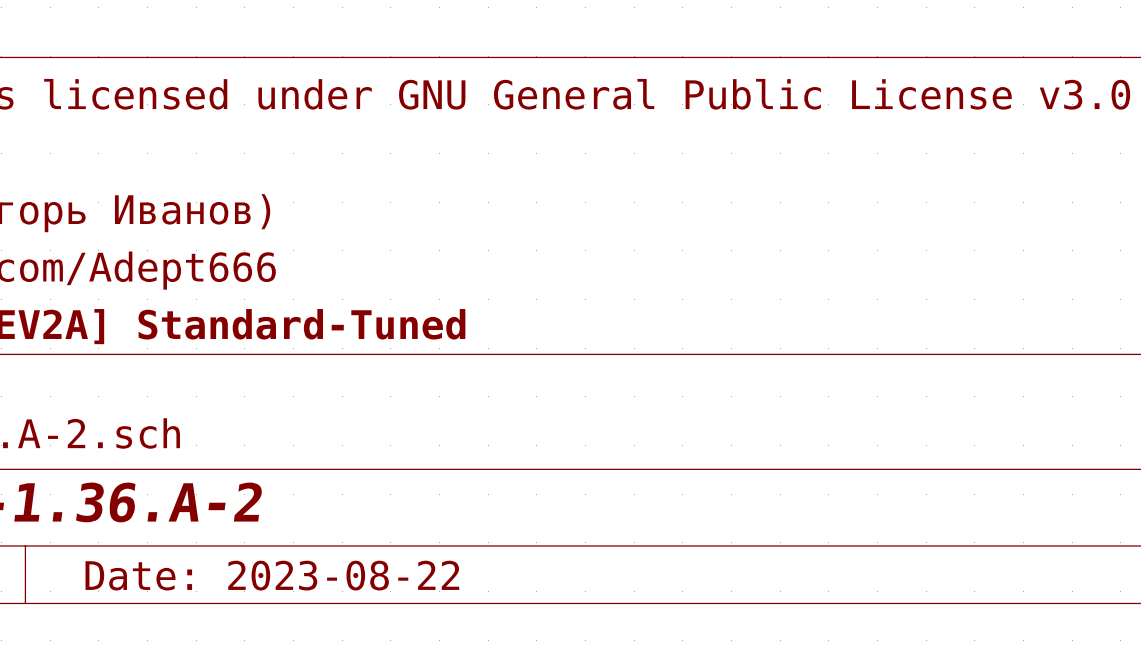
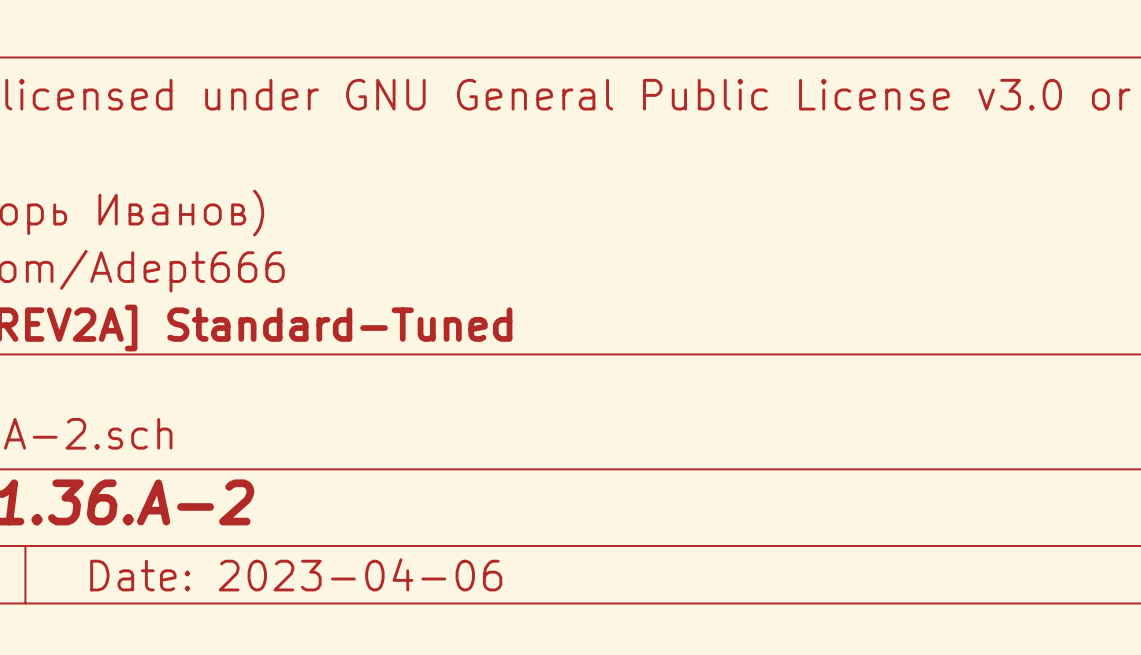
title block: Date: 2023-08-22 (272, 575) -> Date: 2023-04-06 (296, 574)

